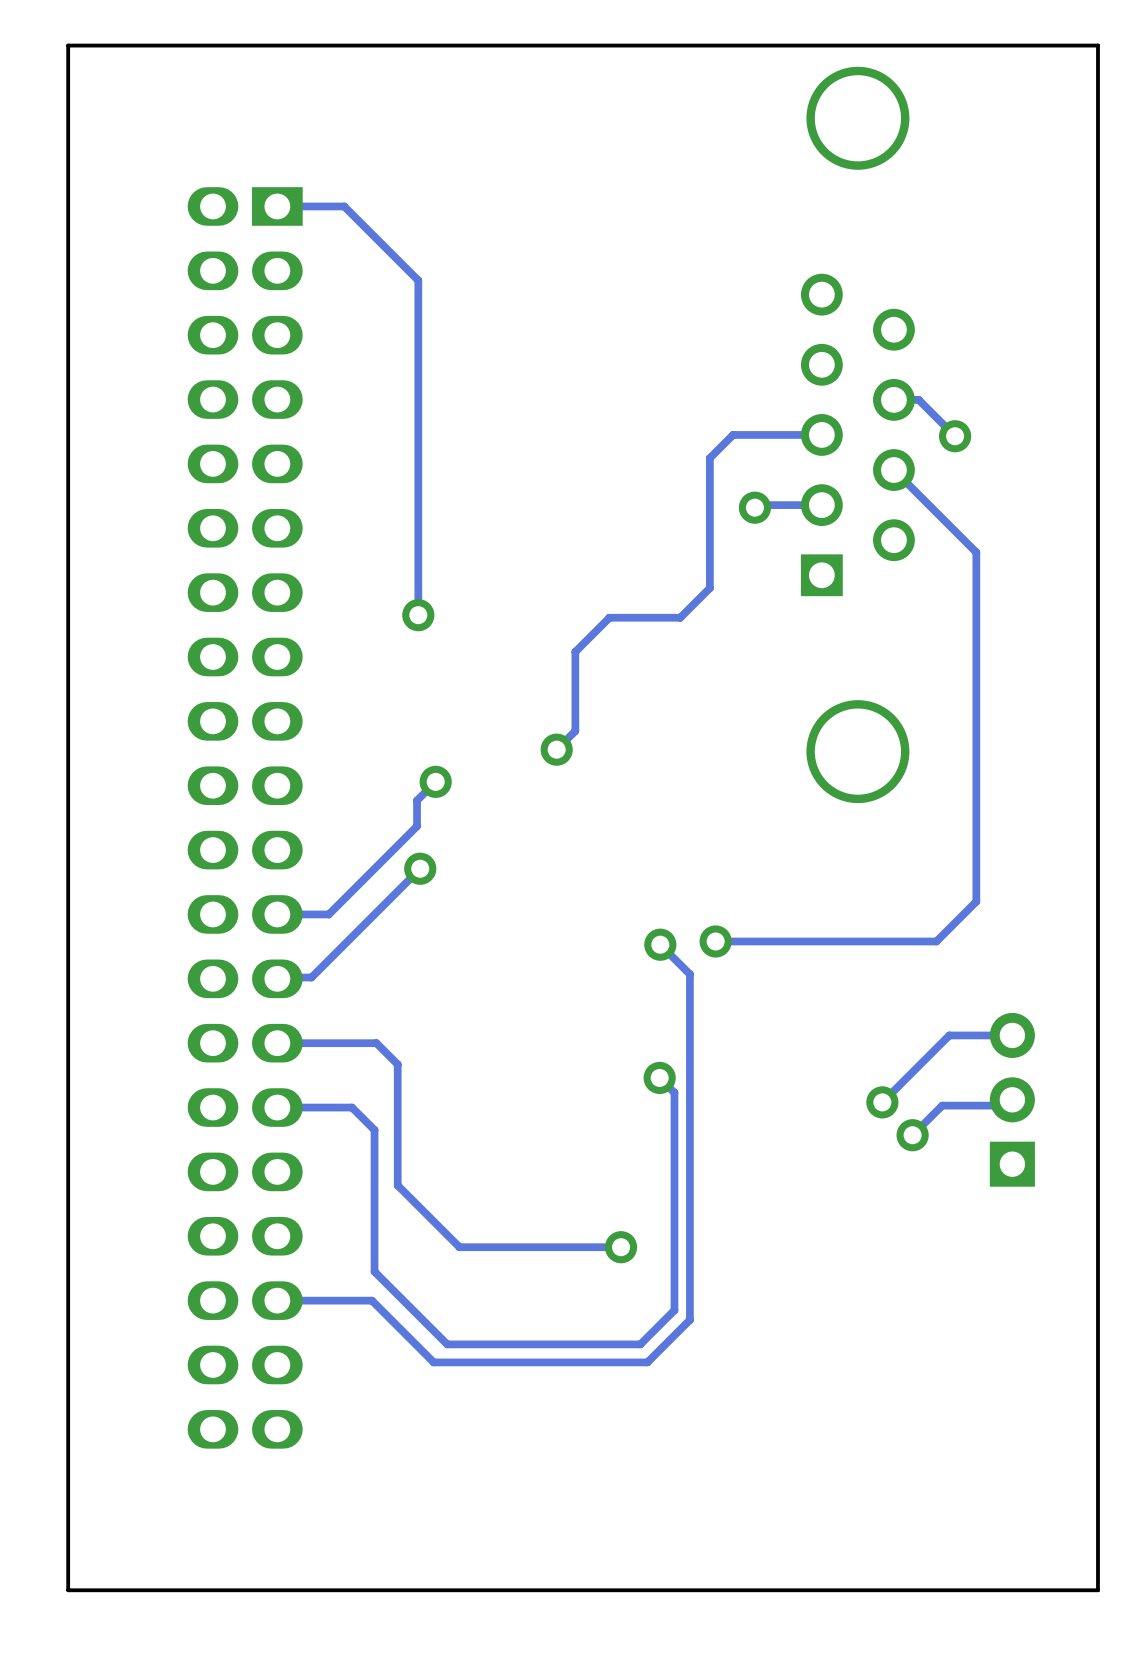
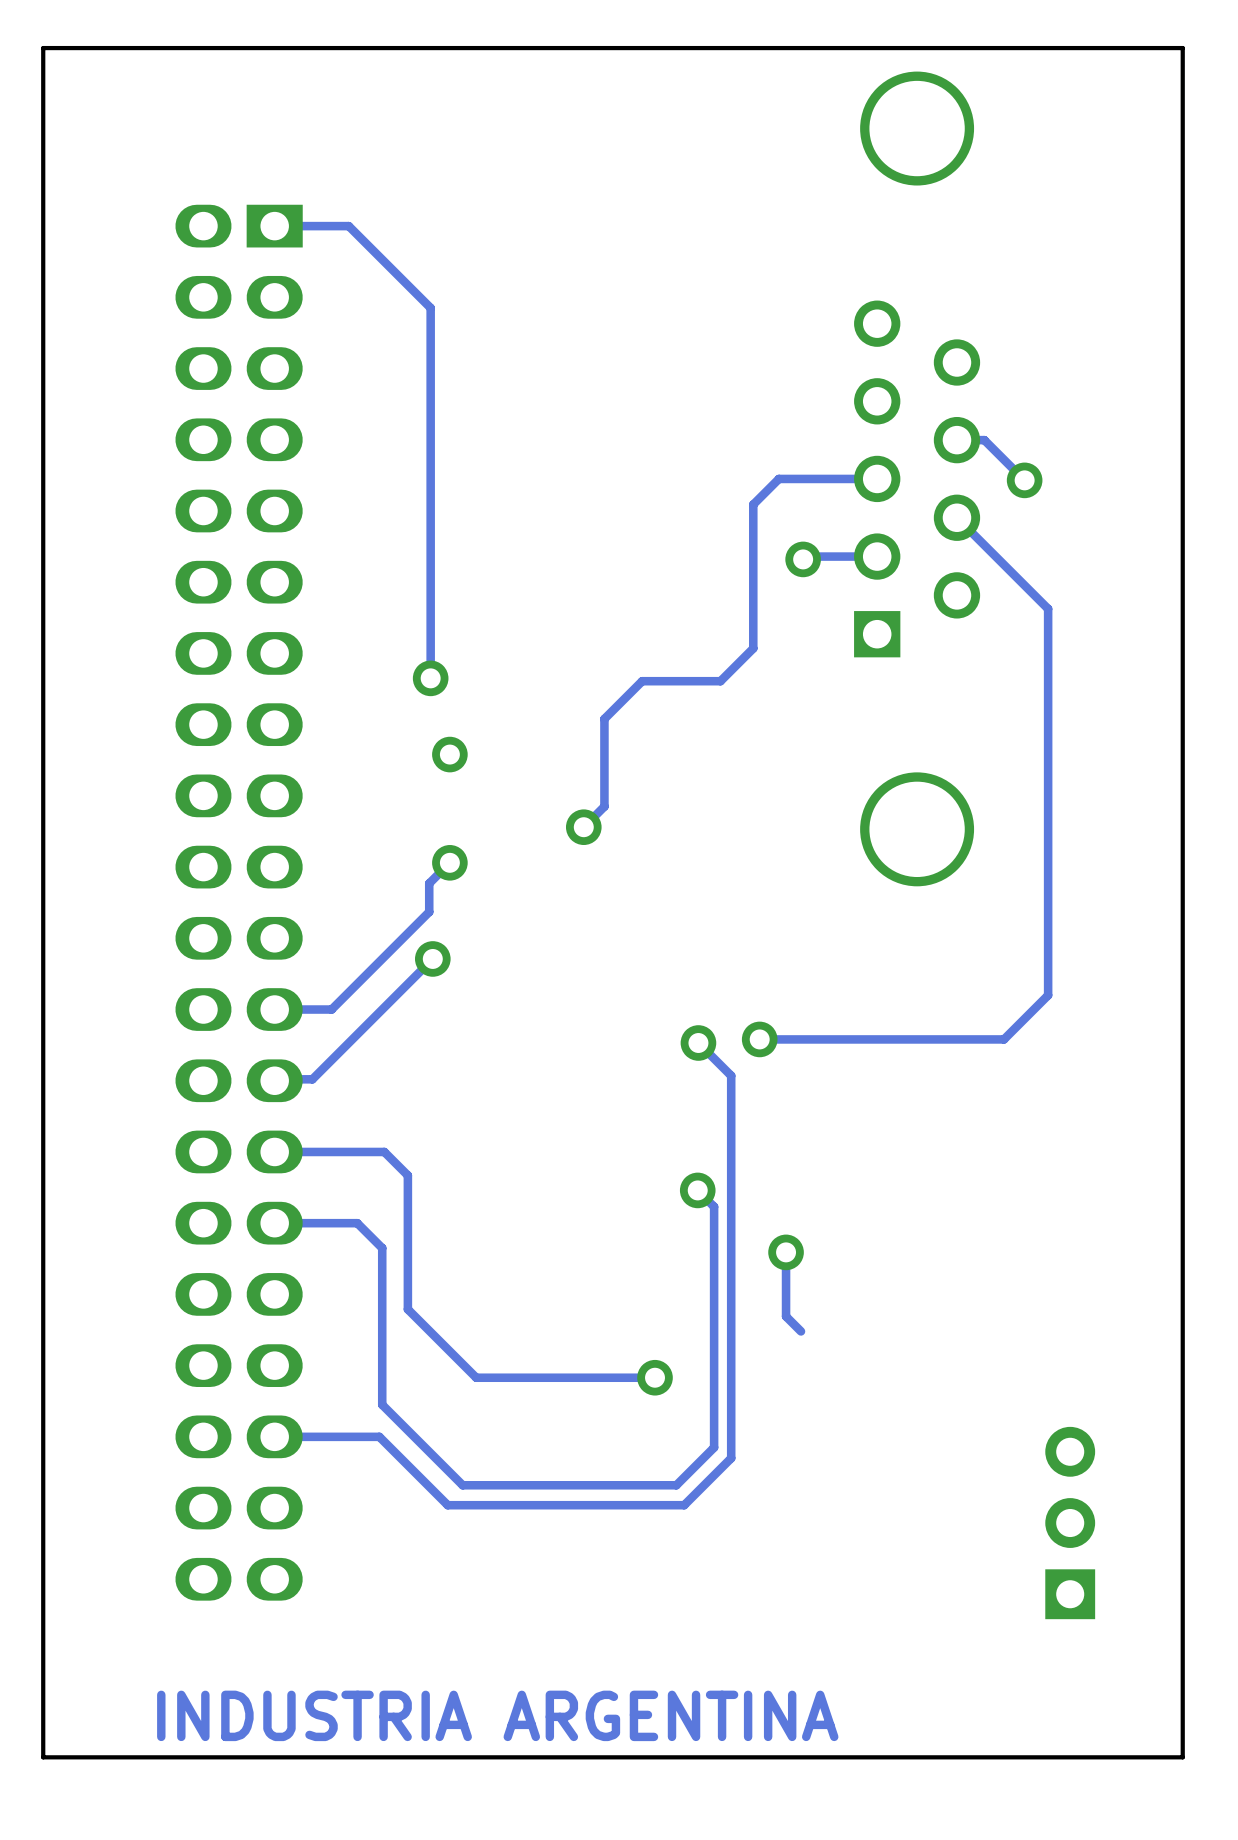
via: none -> (449, 754)
track: (1012, 1035) (949, 1035) (882, 1102) -> none
track: (1012, 1099) (1006, 1105) (942, 1105) (912, 1135) -> none
part position: (1012, 1099) -> (1070, 1523)
via: (882, 1102) -> none
track: none -> (786, 1252) (786, 1316) (801, 1331)
via: none -> (786, 1252)
via: (912, 1135) -> none
text: none -> INDUSTRIA ARGENTINA (497, 1715)

